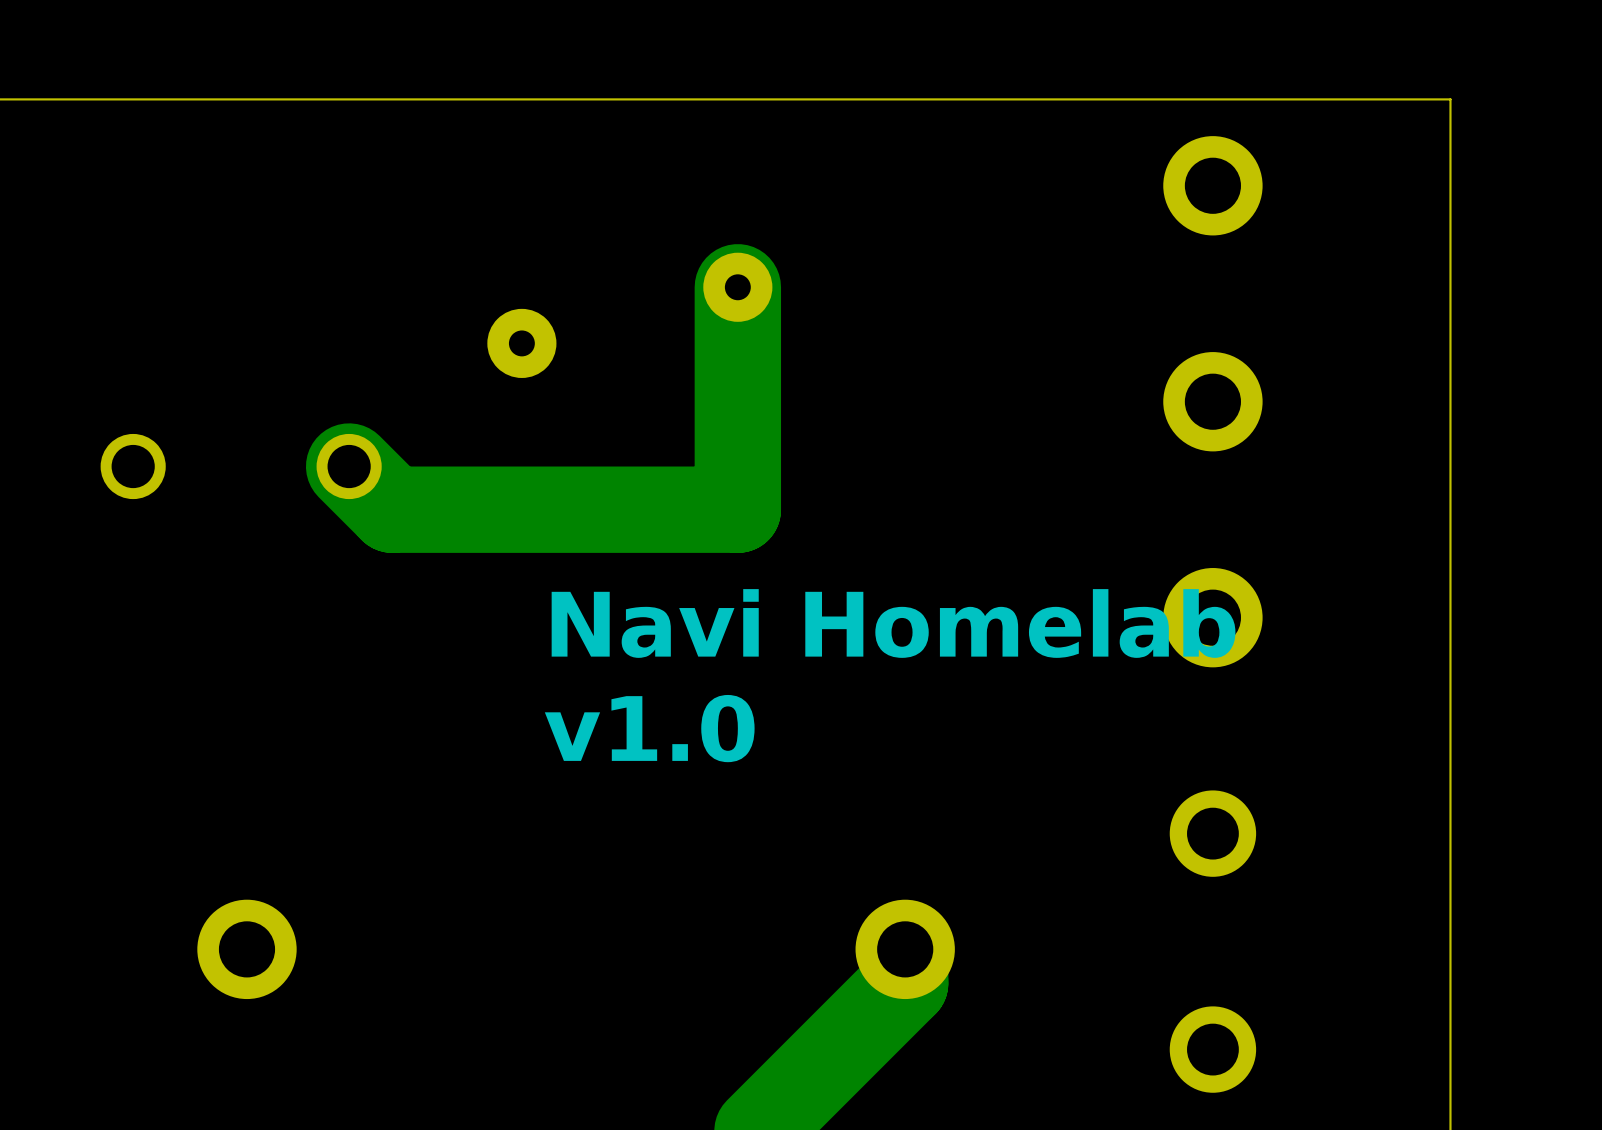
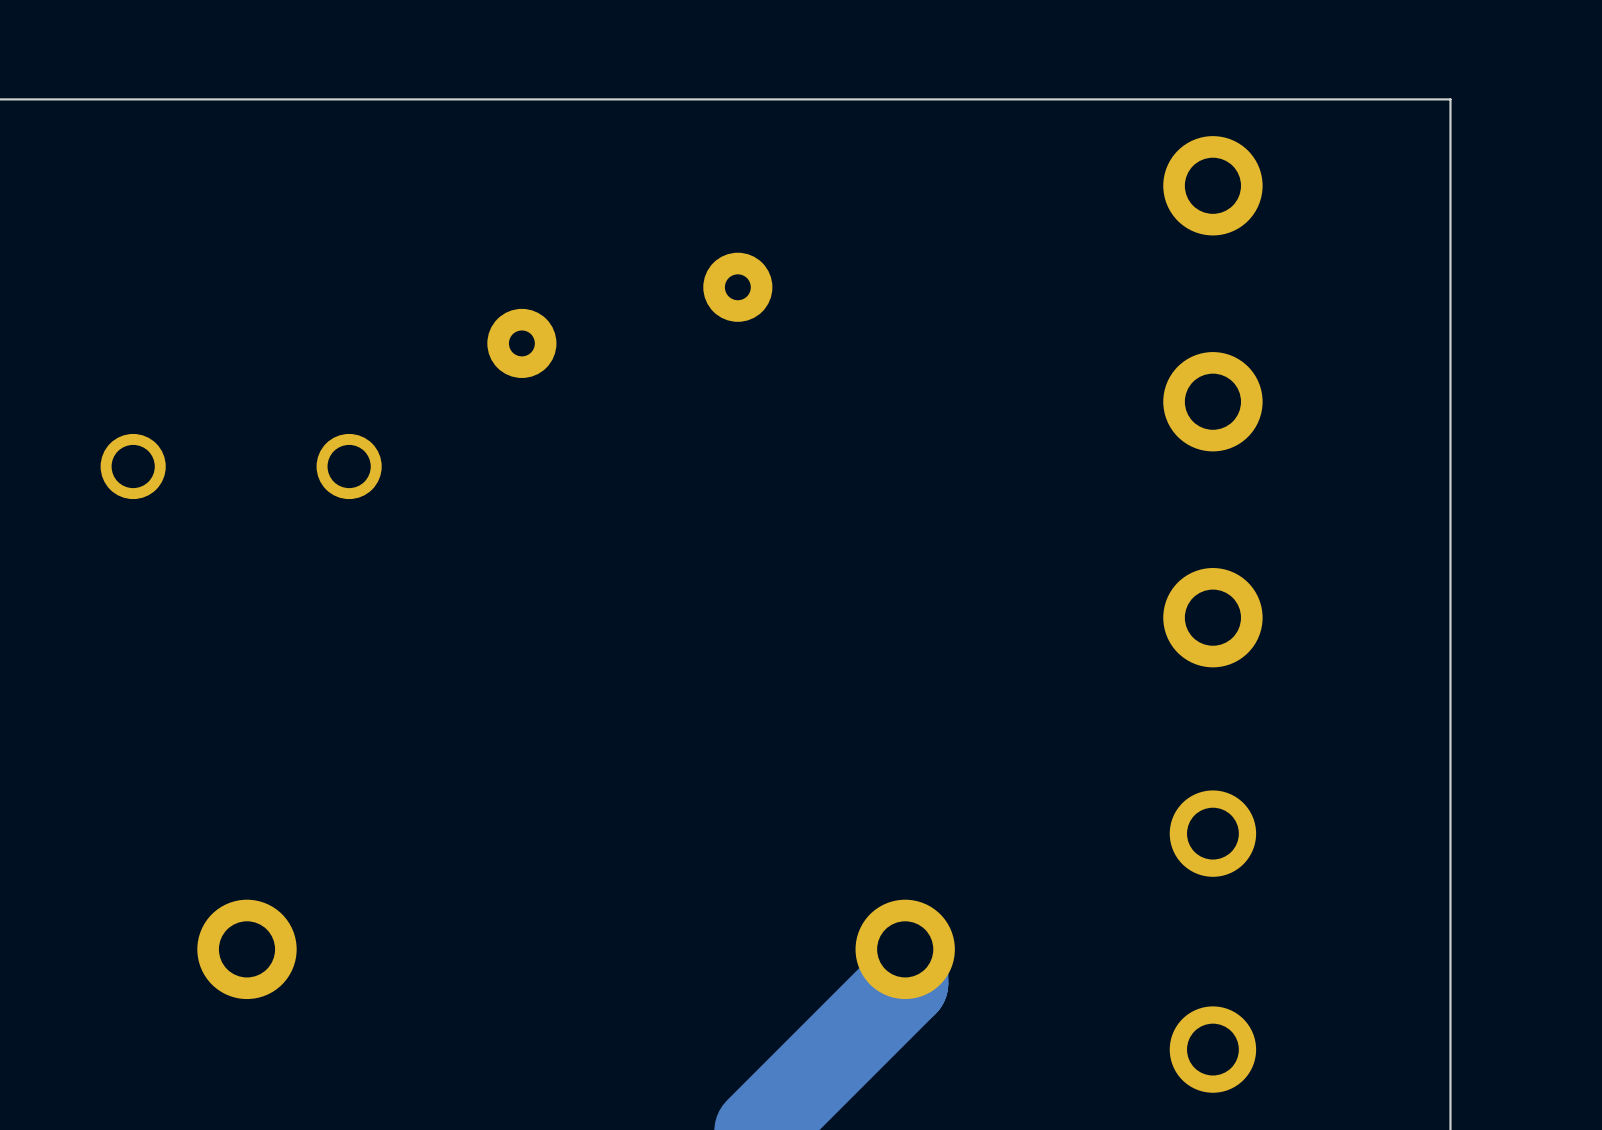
track: (737, 287) (737, 509) (392, 509) (349, 466) -> none
text: Navi Homelab (893, 623) -> none
text: v1.0 (649, 728) -> none

